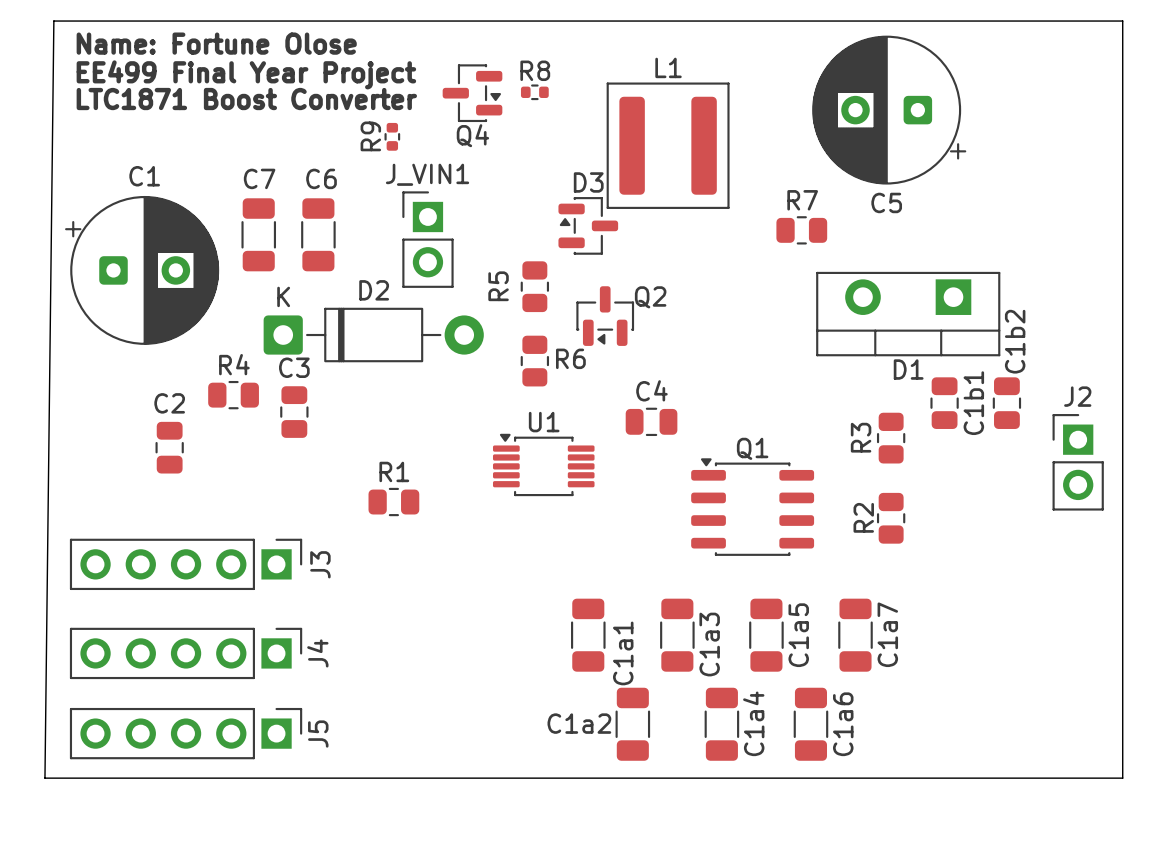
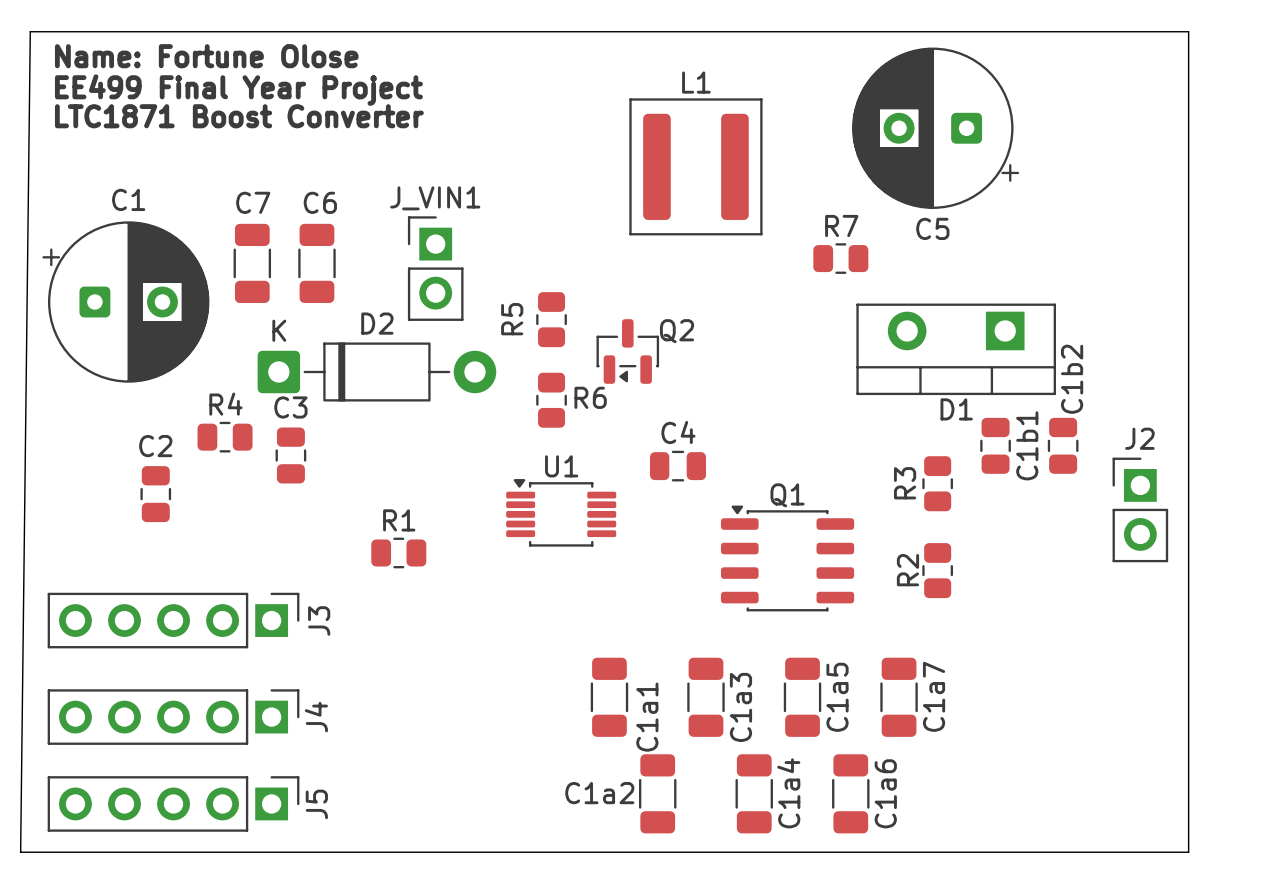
R8: (534, 92) -> none
Q4: (472, 93) -> none
R9: (392, 136) -> none
D3: (588, 225) -> none

